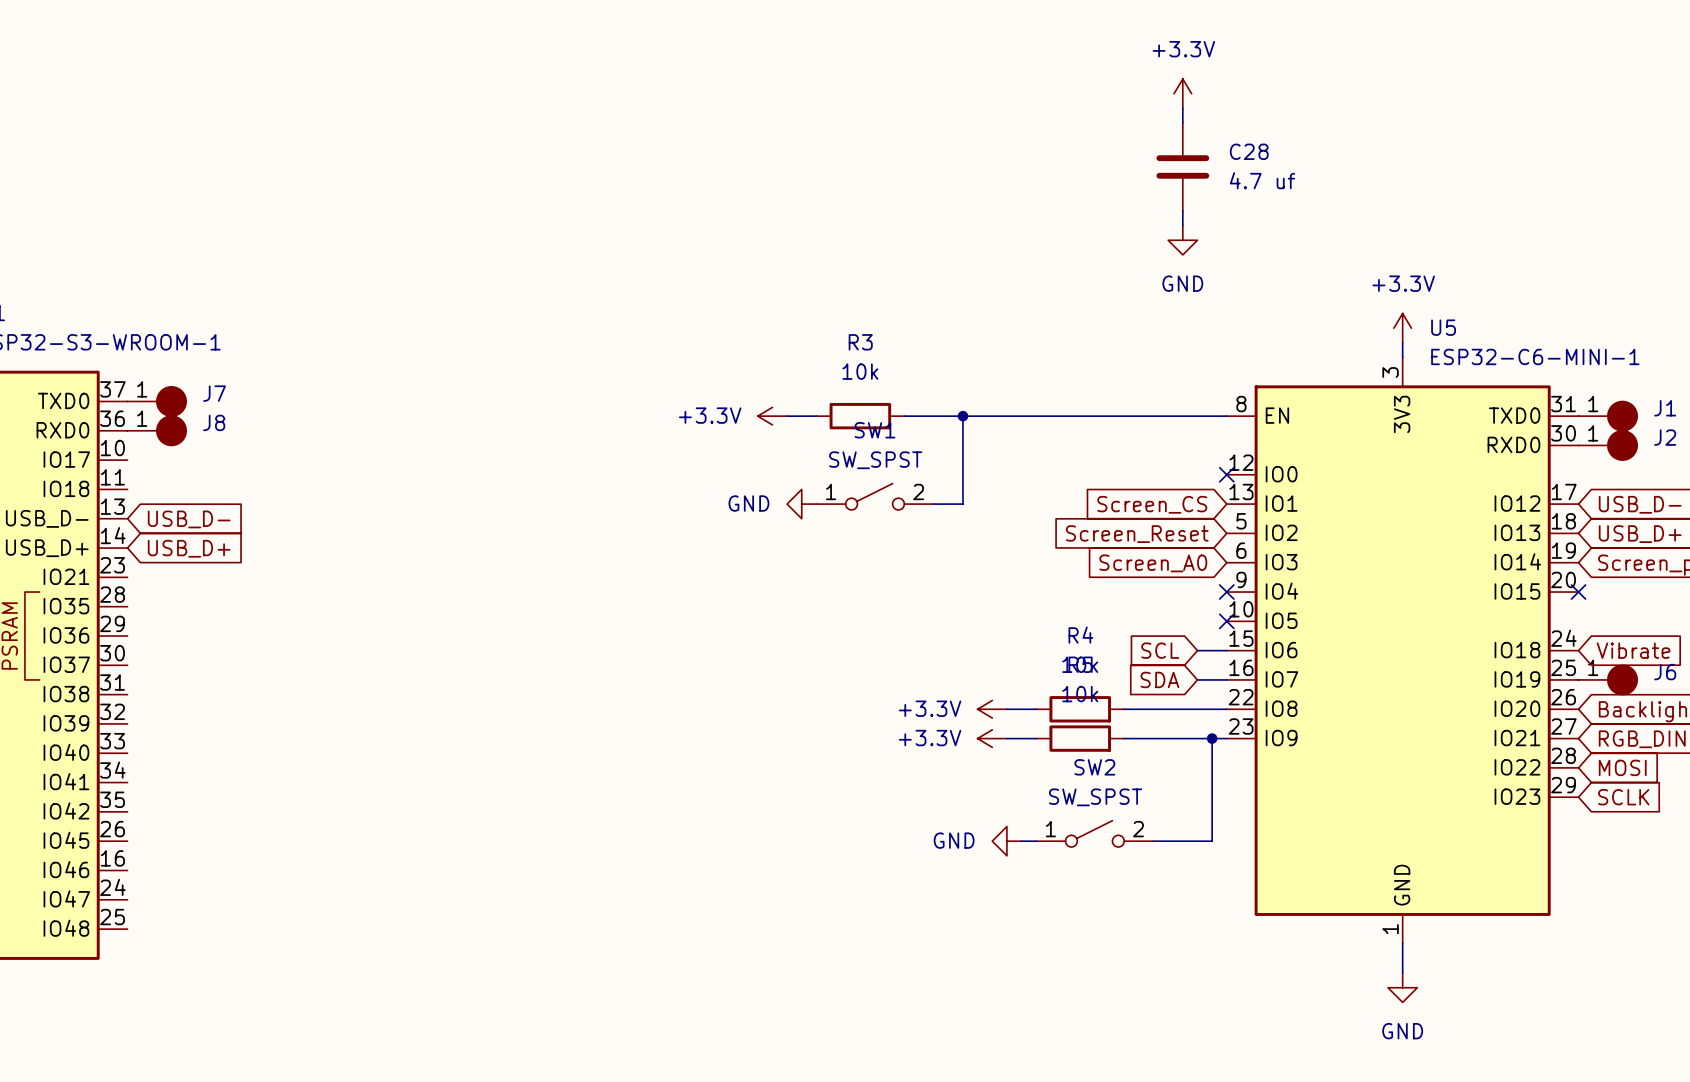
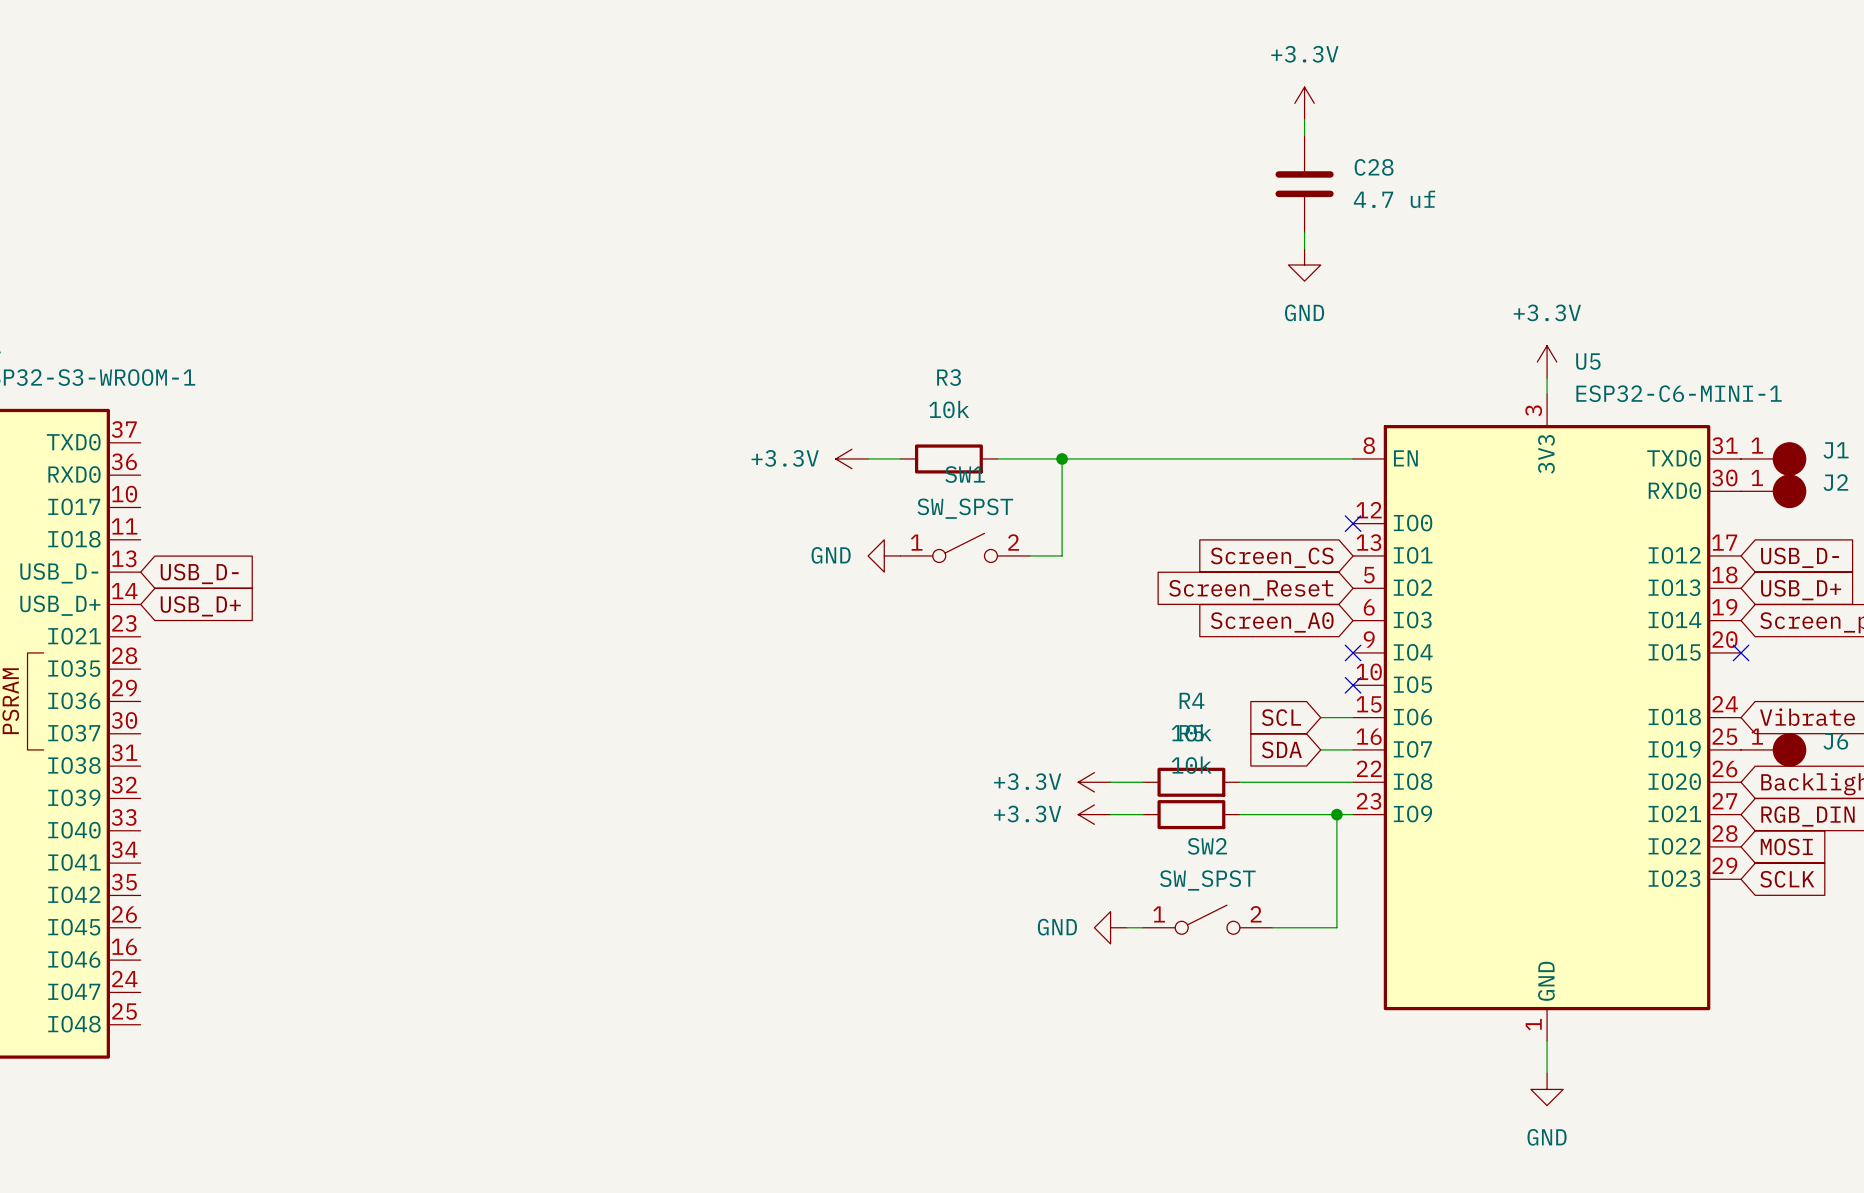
J7: (156, 401) -> none
J8: (156, 430) -> none

